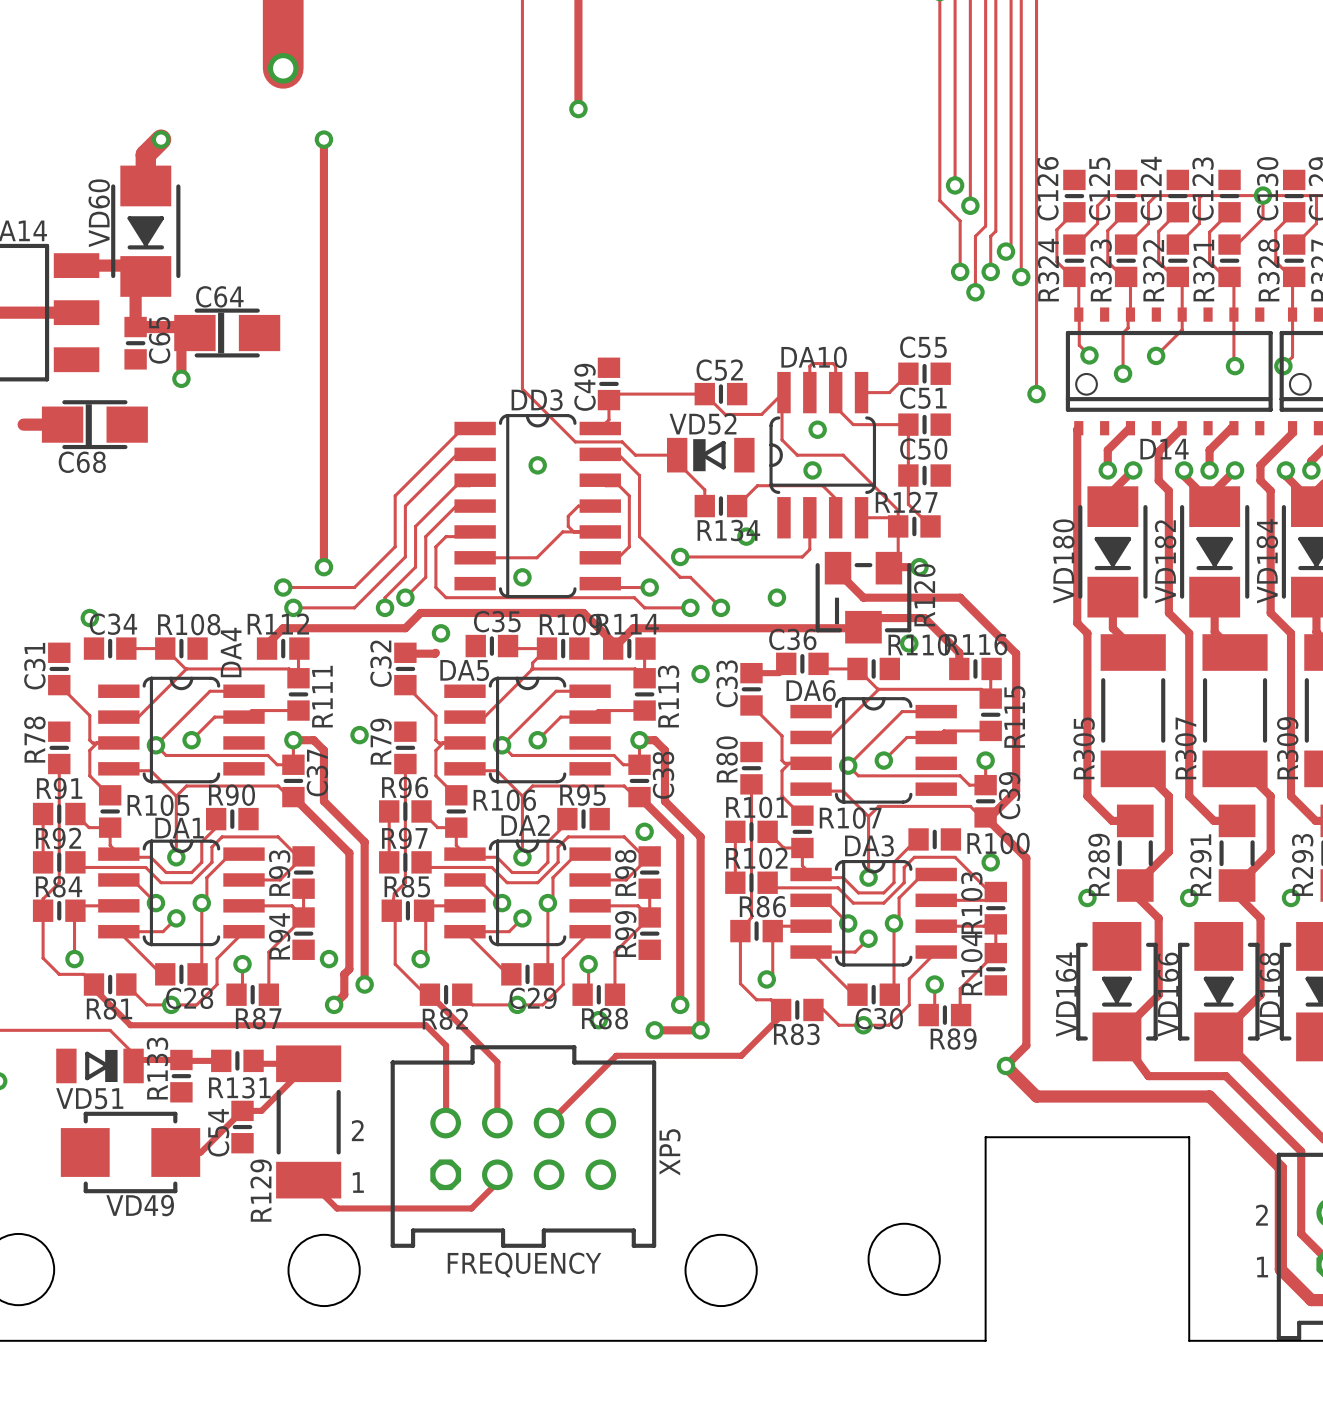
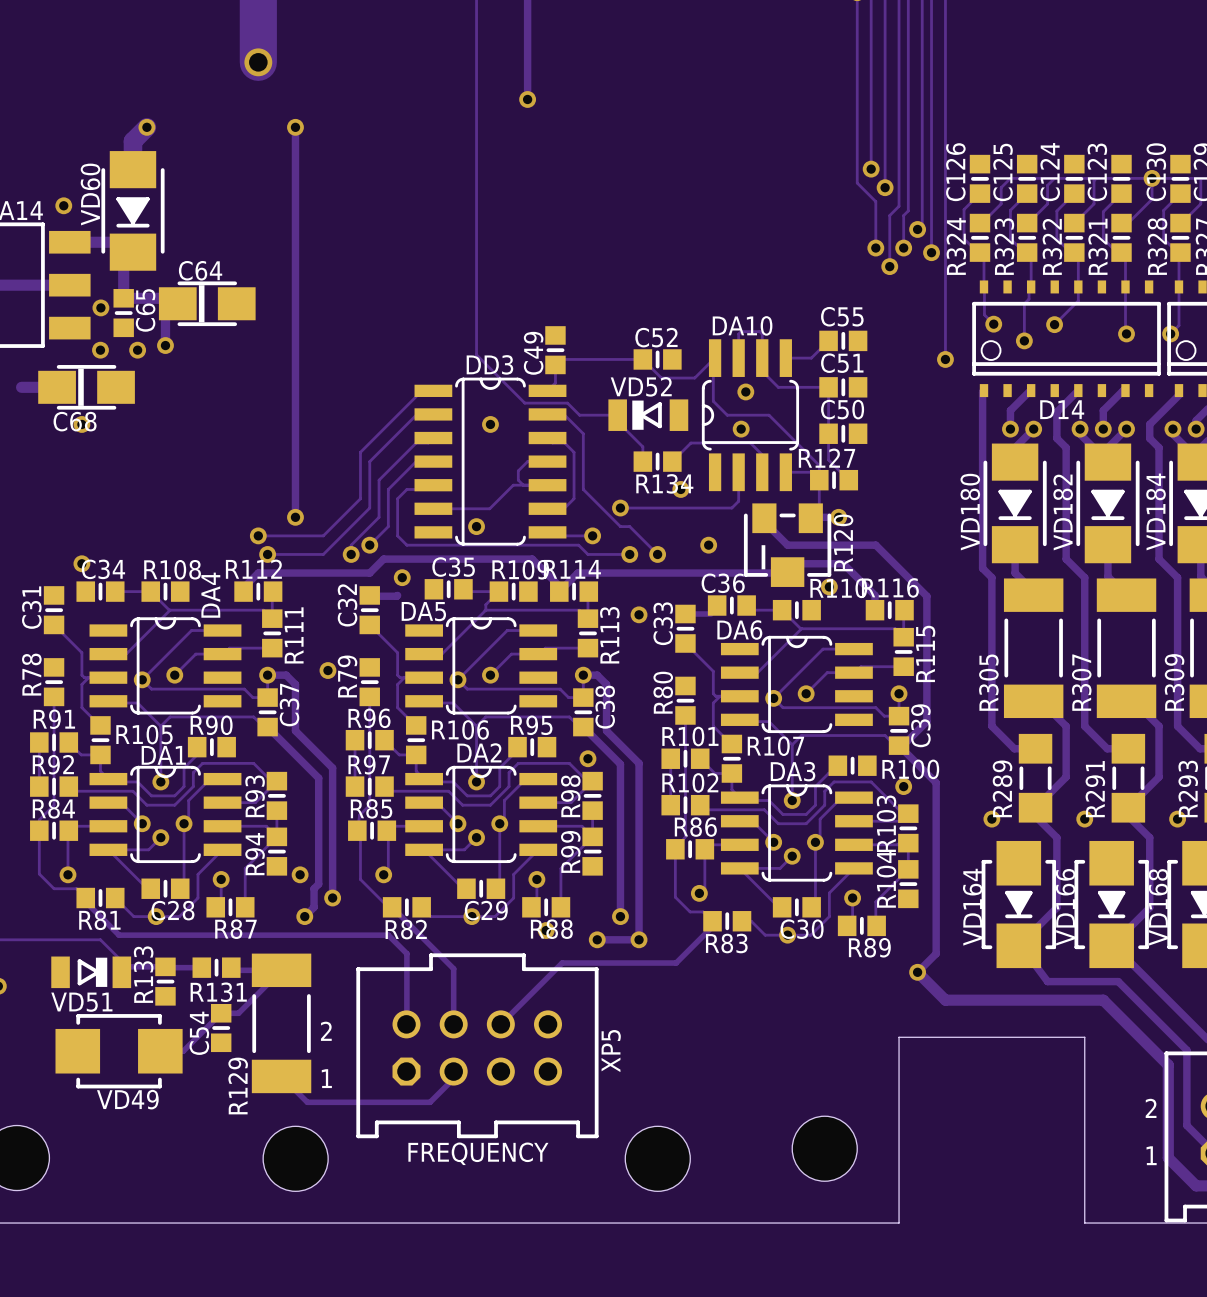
via: none -> (63, 205)
via: none -> (100, 307)
via: none -> (100, 350)
via: none -> (137, 350)
via: none -> (81, 424)

